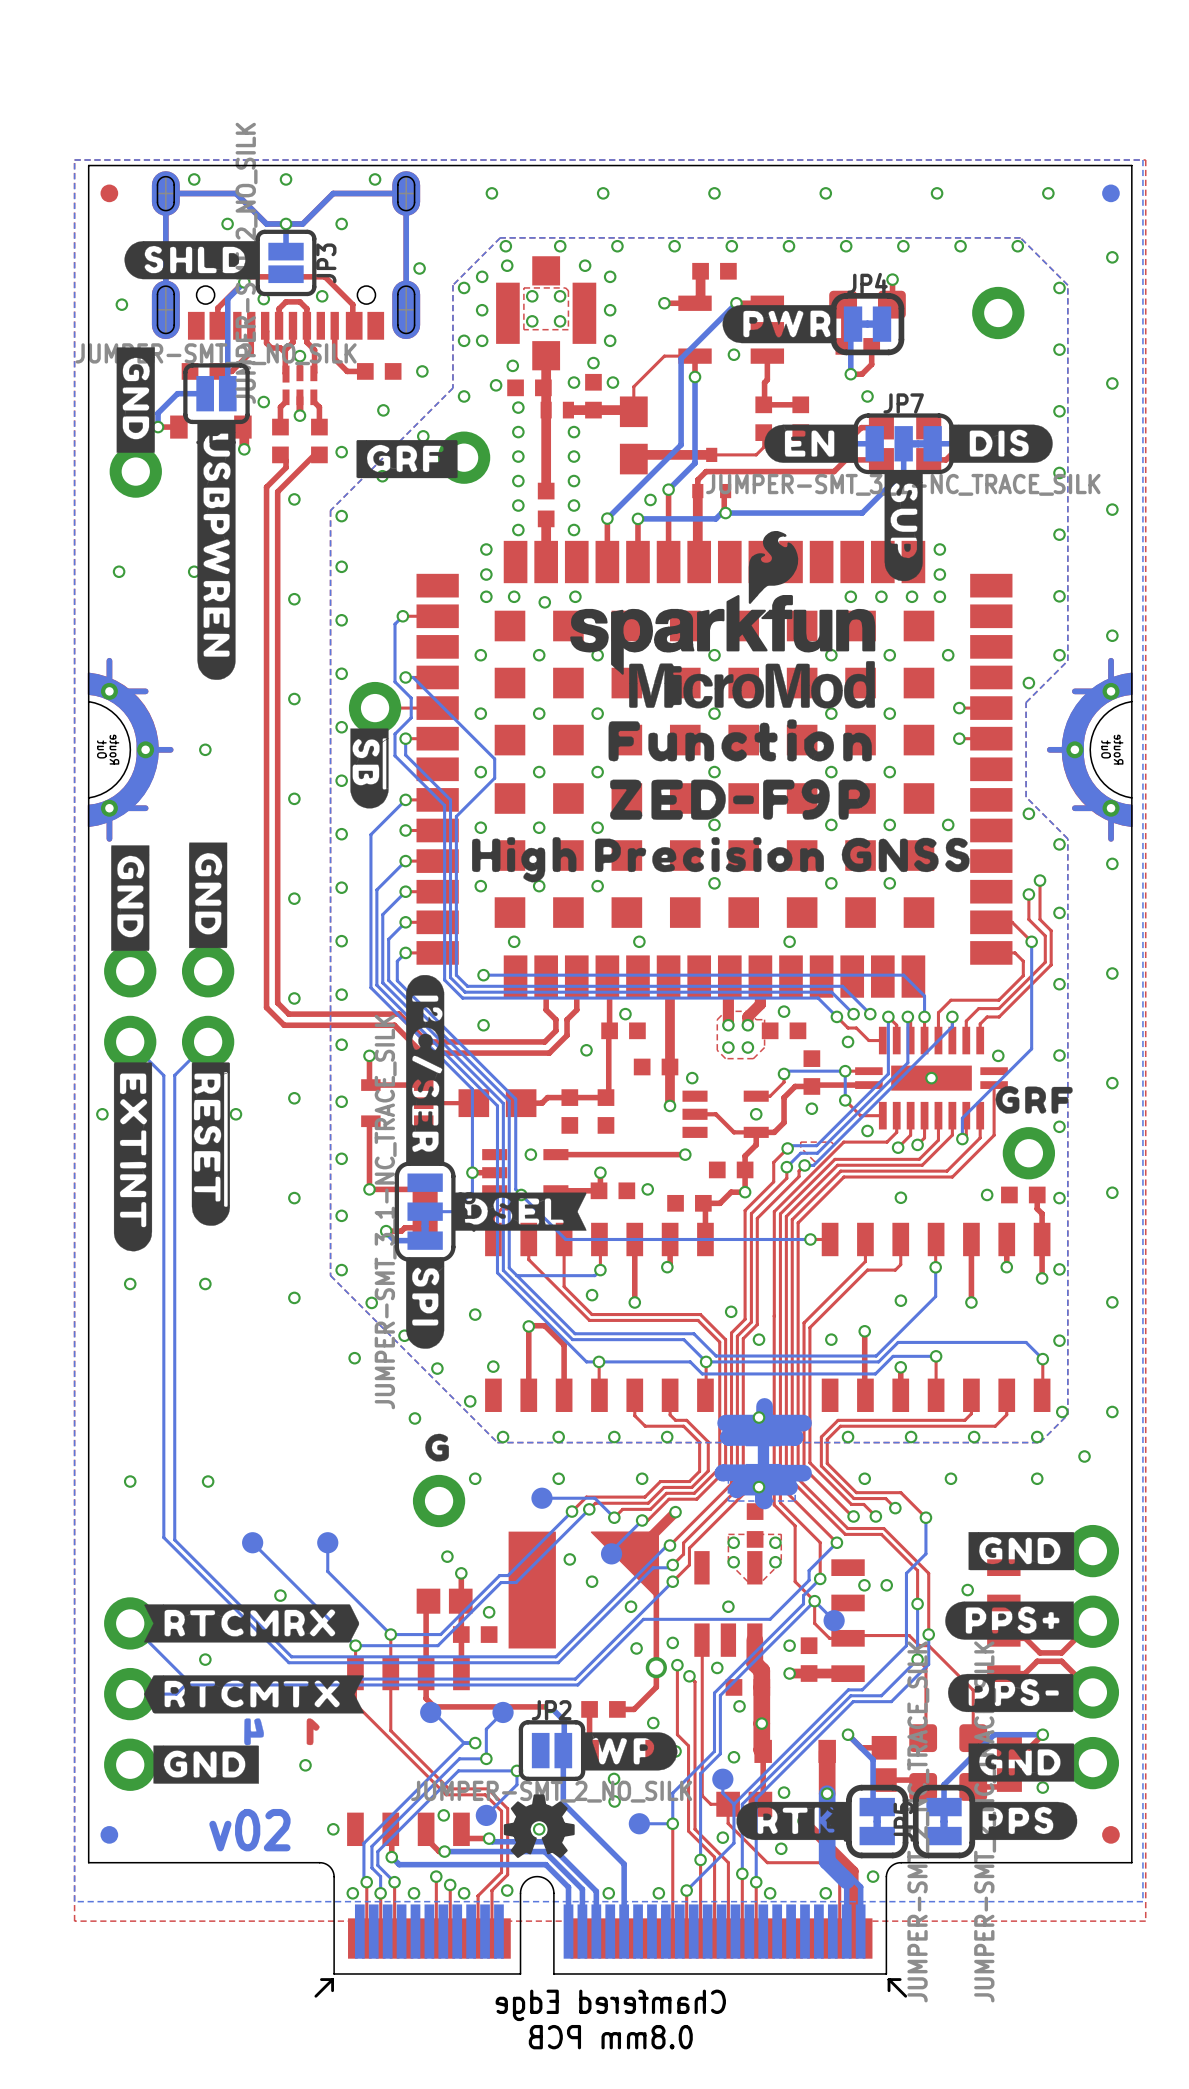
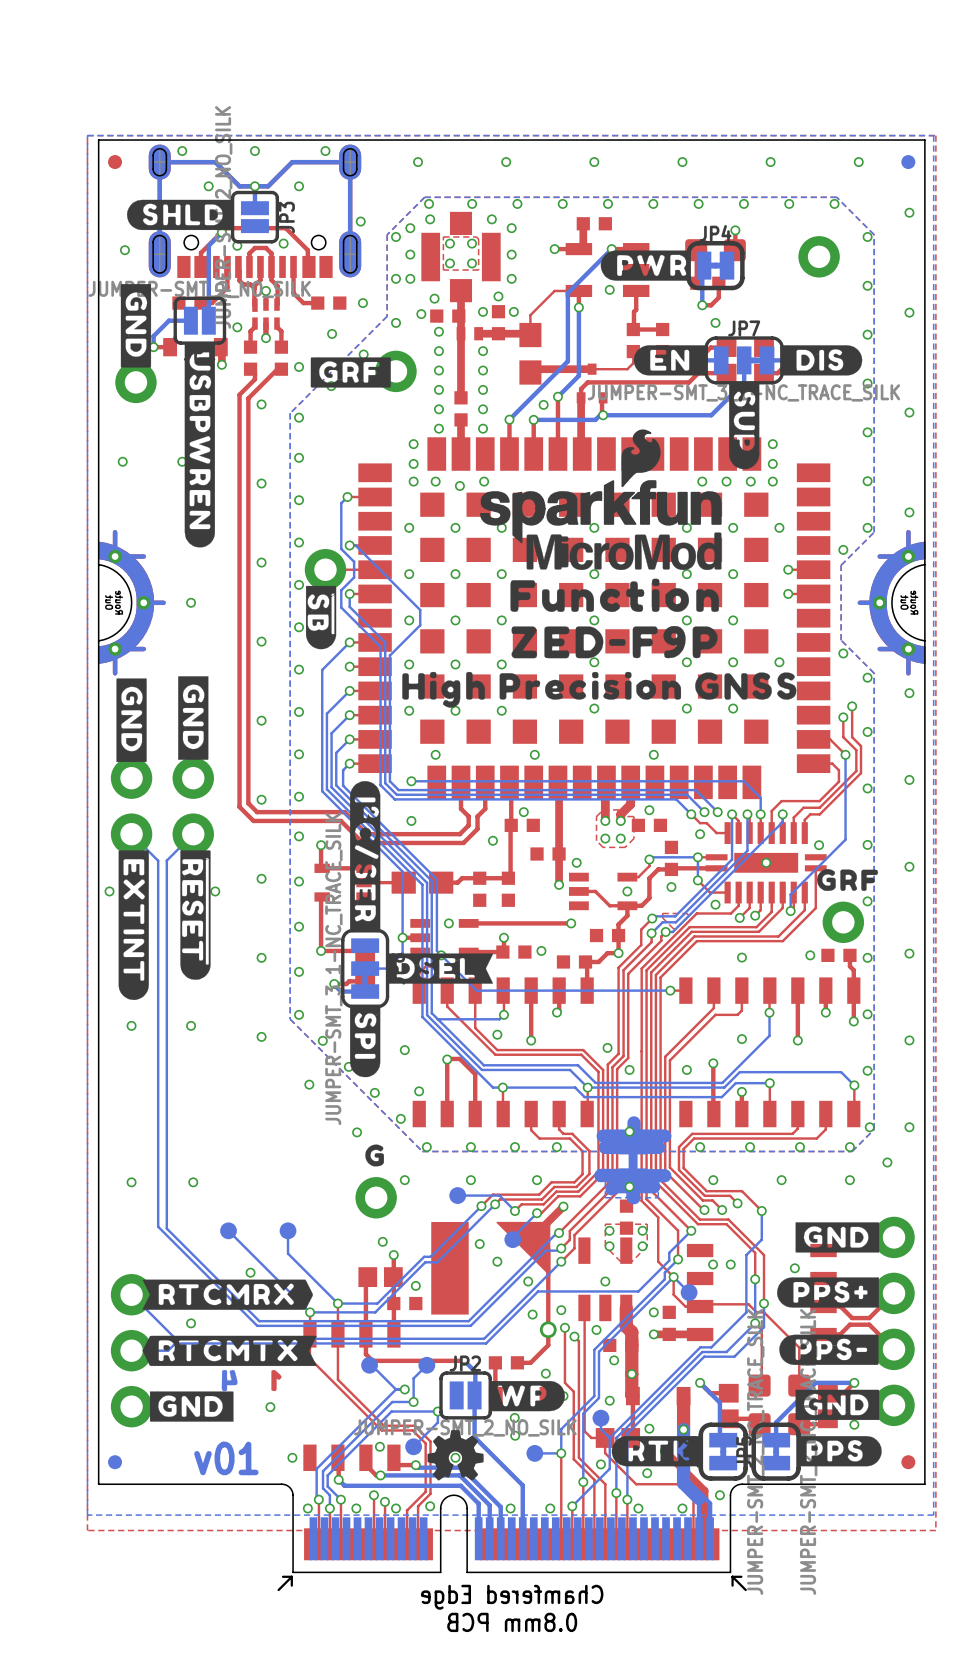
text: v02 (249, 1830) -> v01 (226, 1458)

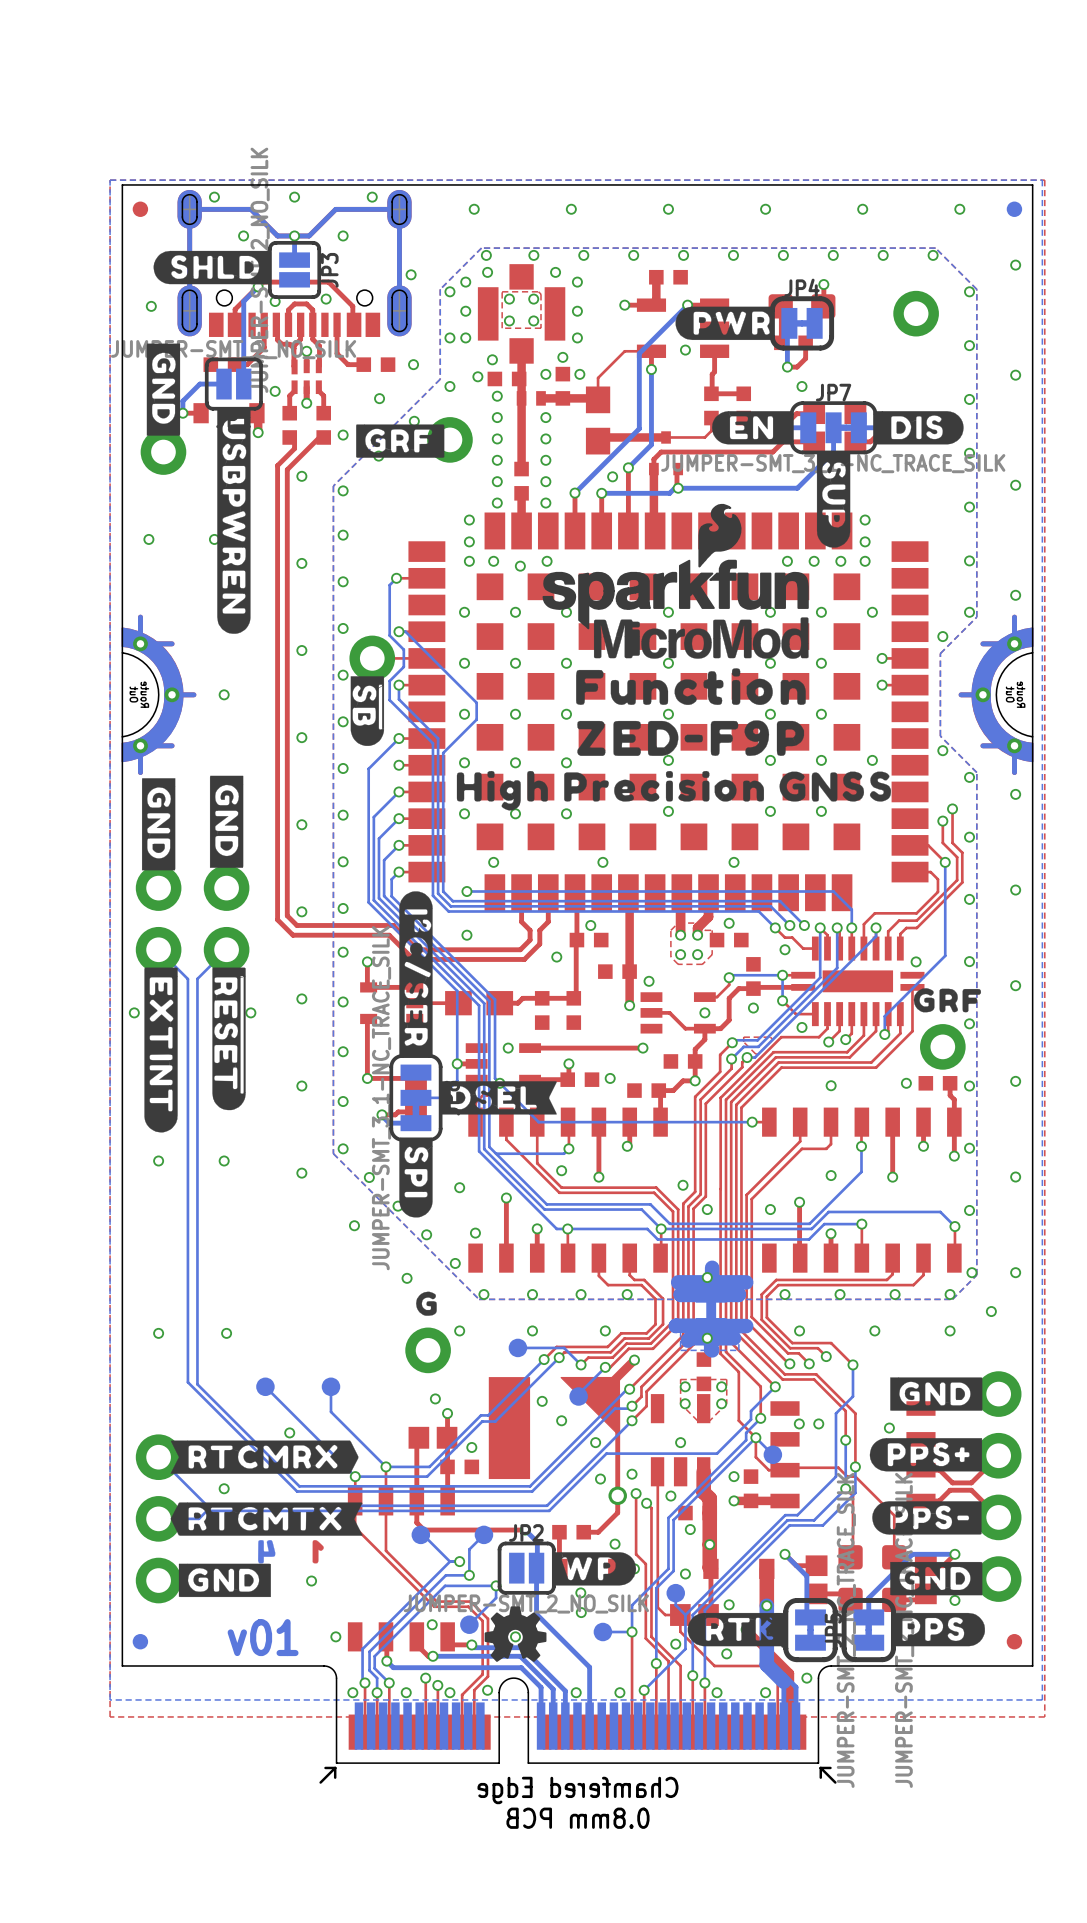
via: (766, 862) -> none
top track: (447, 1059) (459, 1058) (475, 1074) (475, 1087) -> none
via: none -> (537, 1228)

